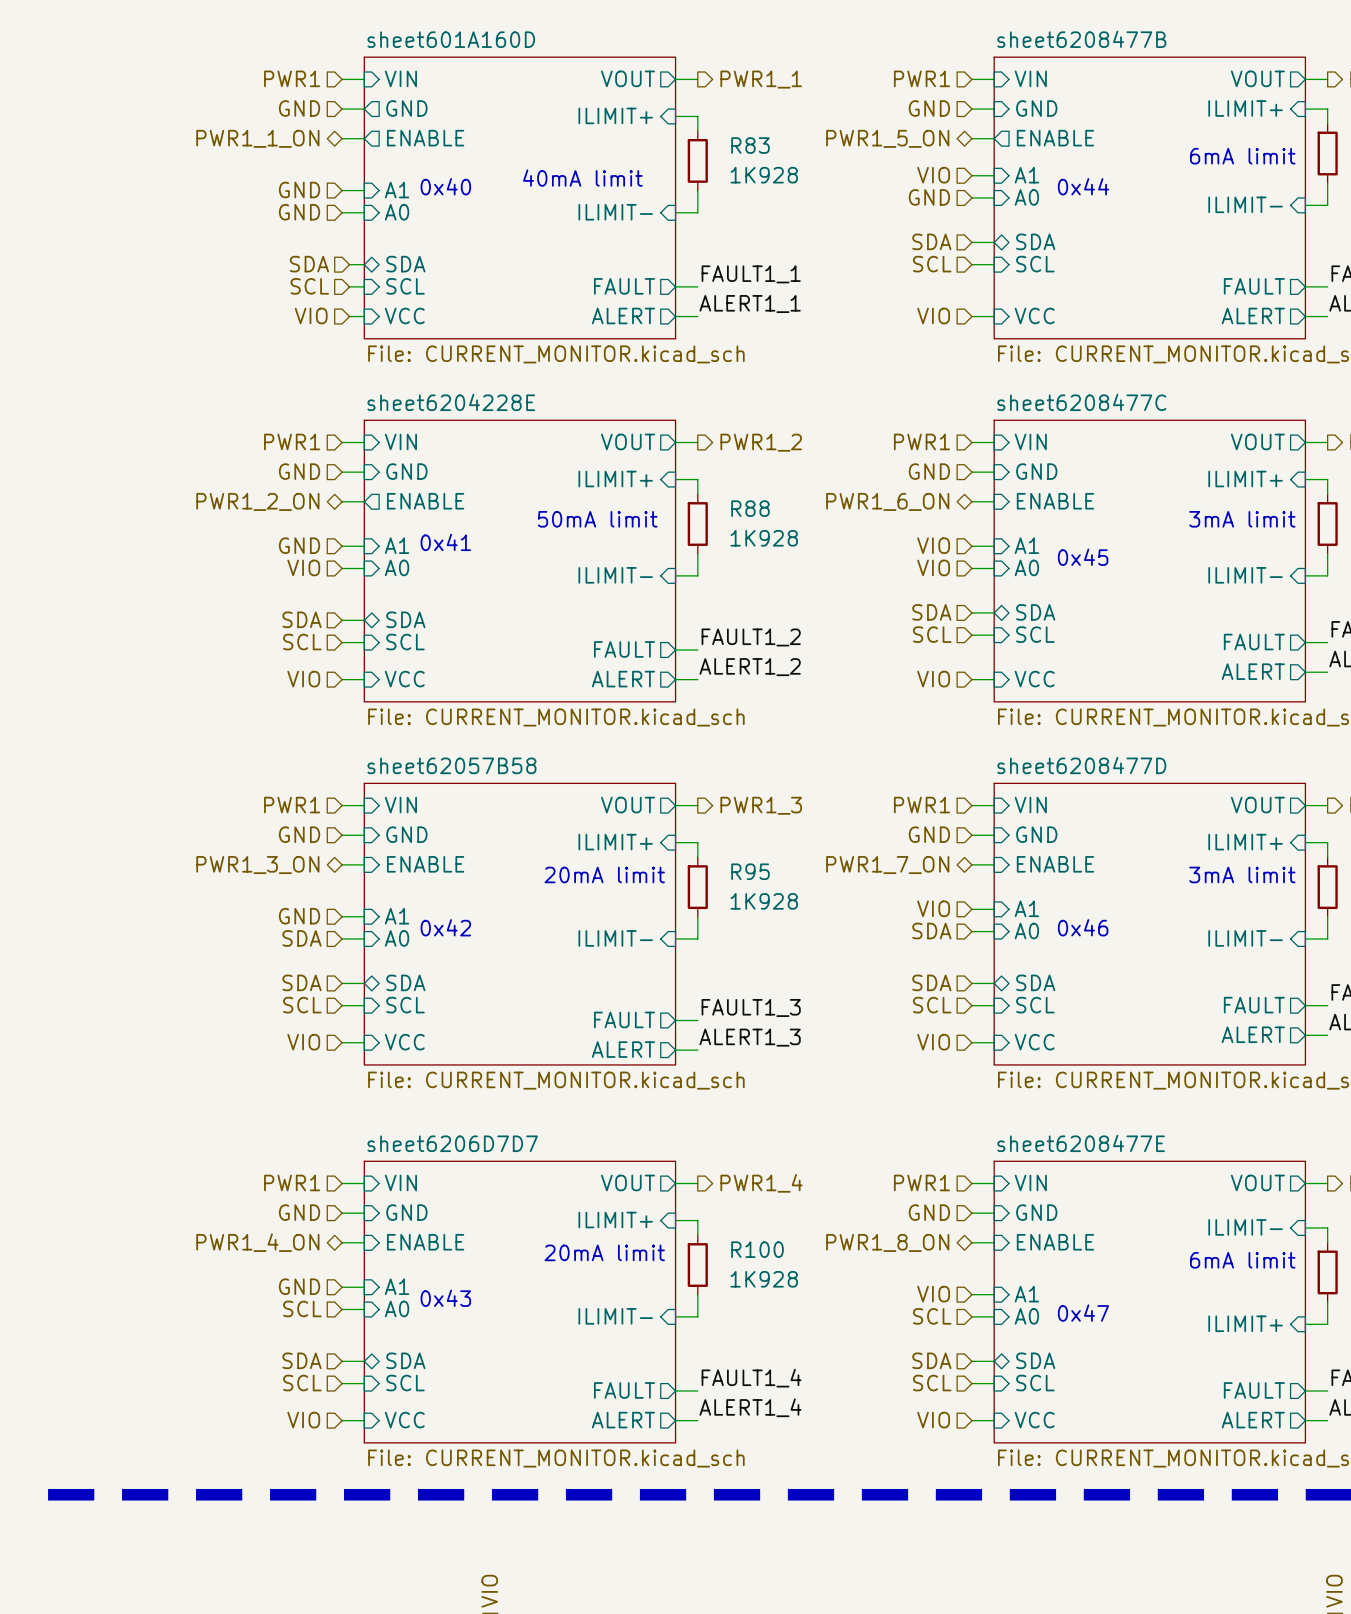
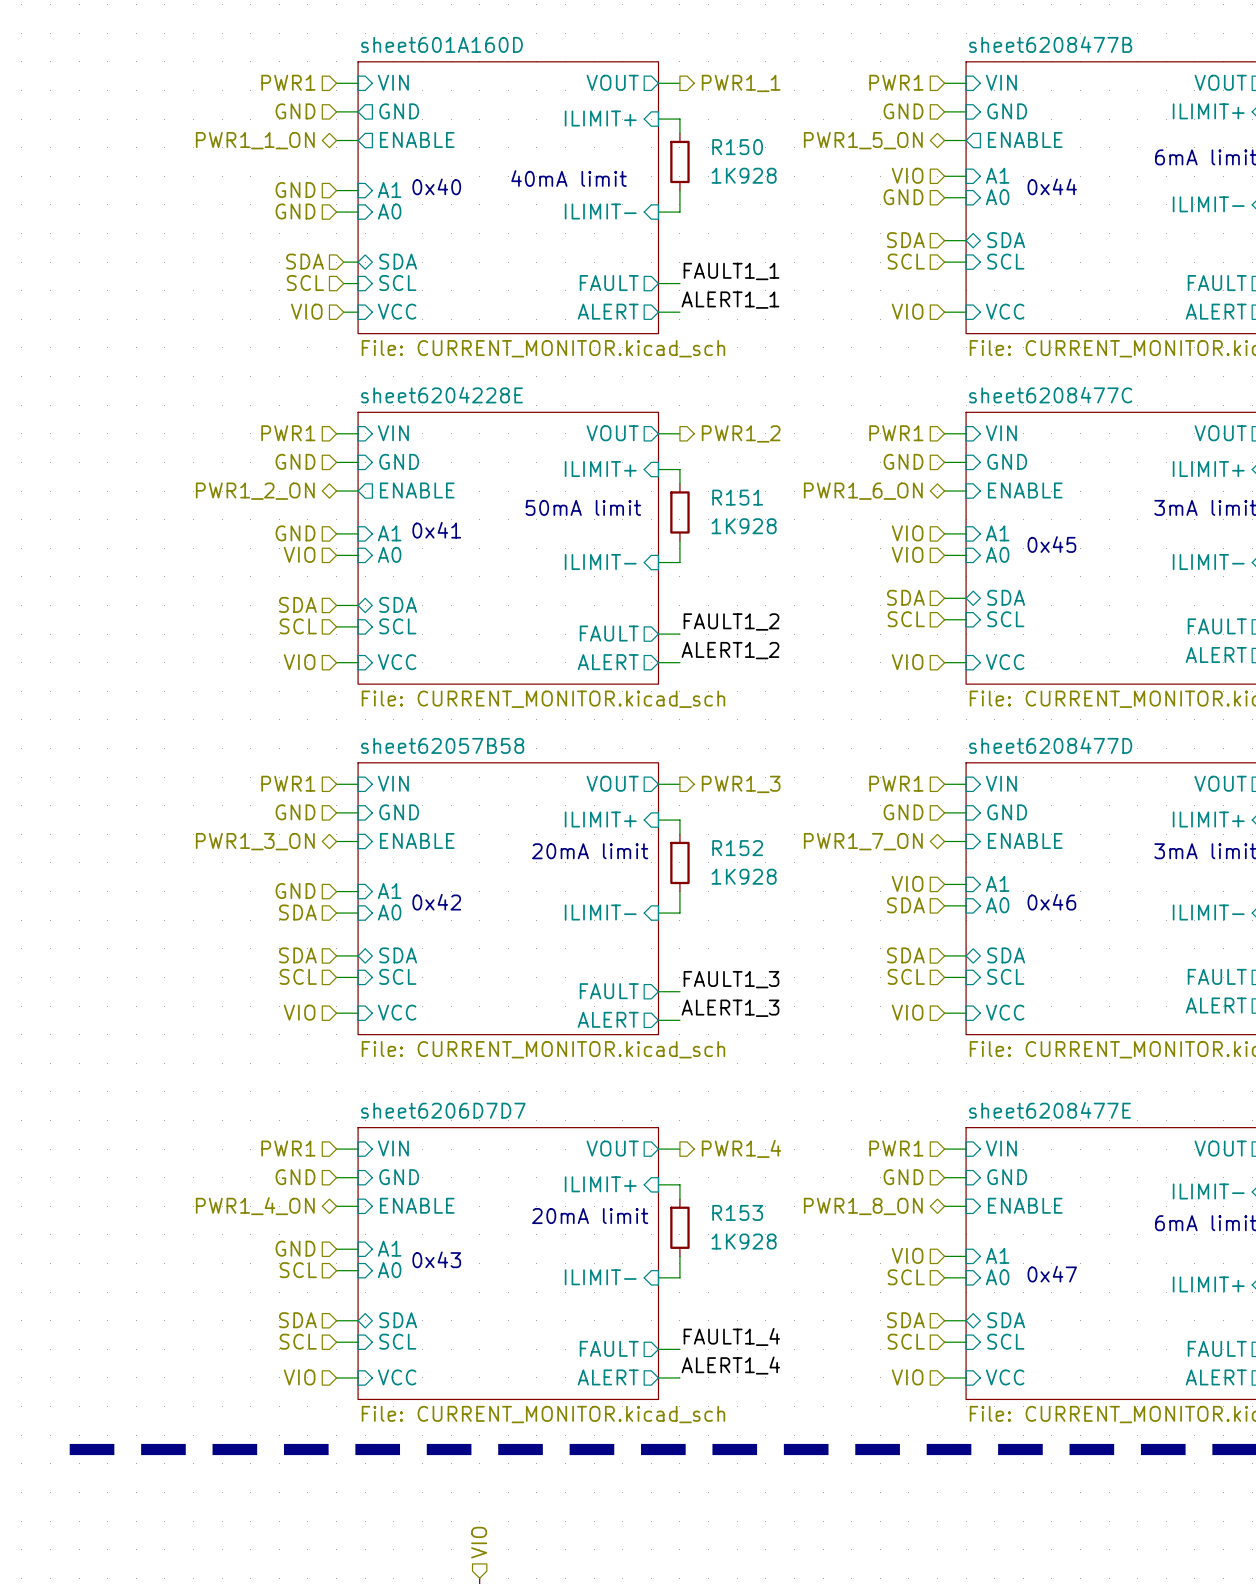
R83 name: R83 (750, 145) -> R150 (737, 147)
R88 name: R88 (750, 508) -> R151 (737, 497)
R95 name: R95 (750, 871) -> R152 (737, 848)
R100 name: R100 (757, 1249) -> R153 (737, 1212)

